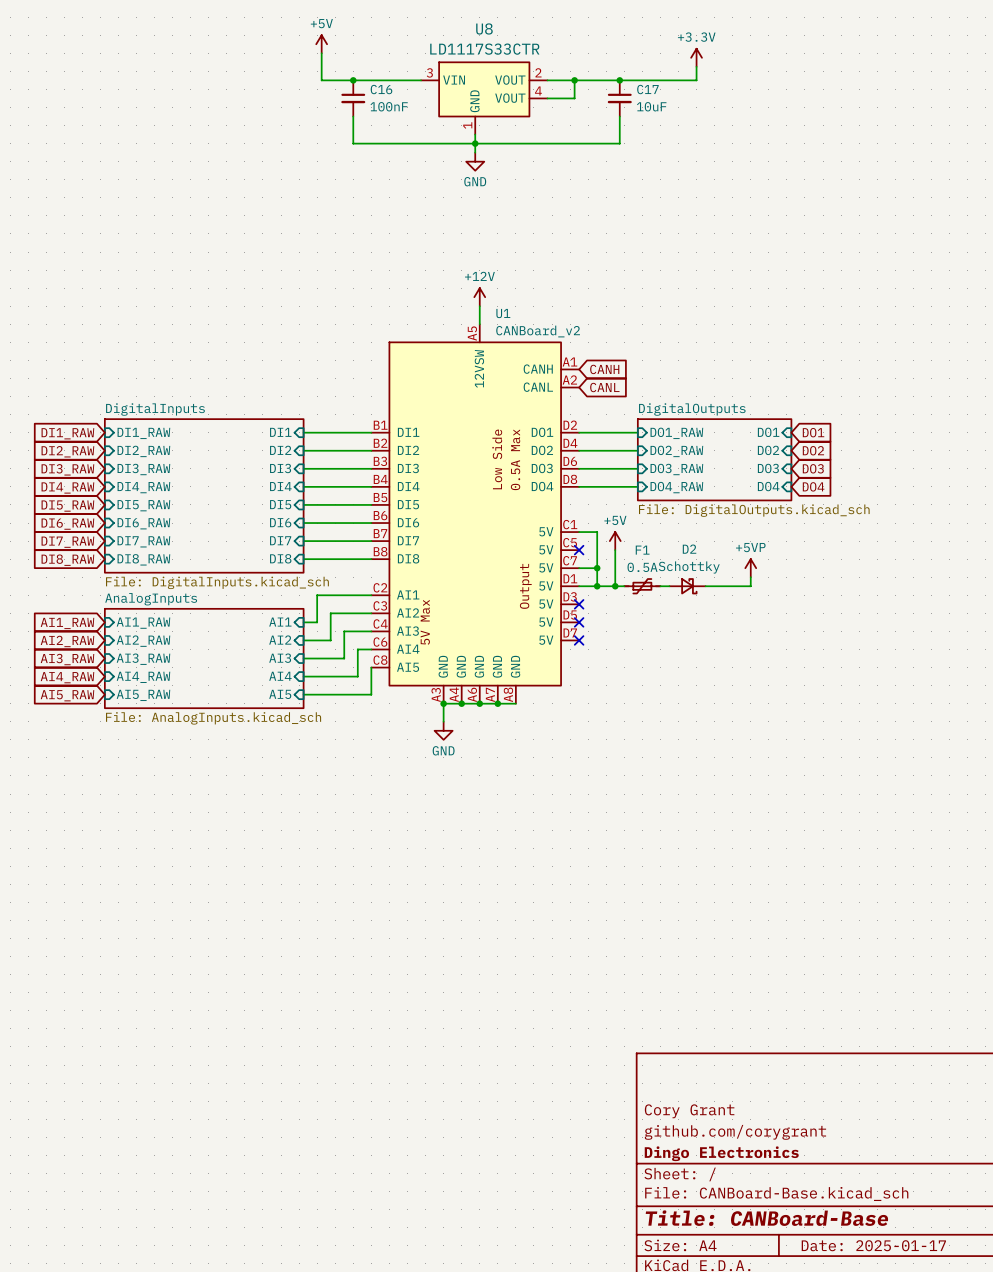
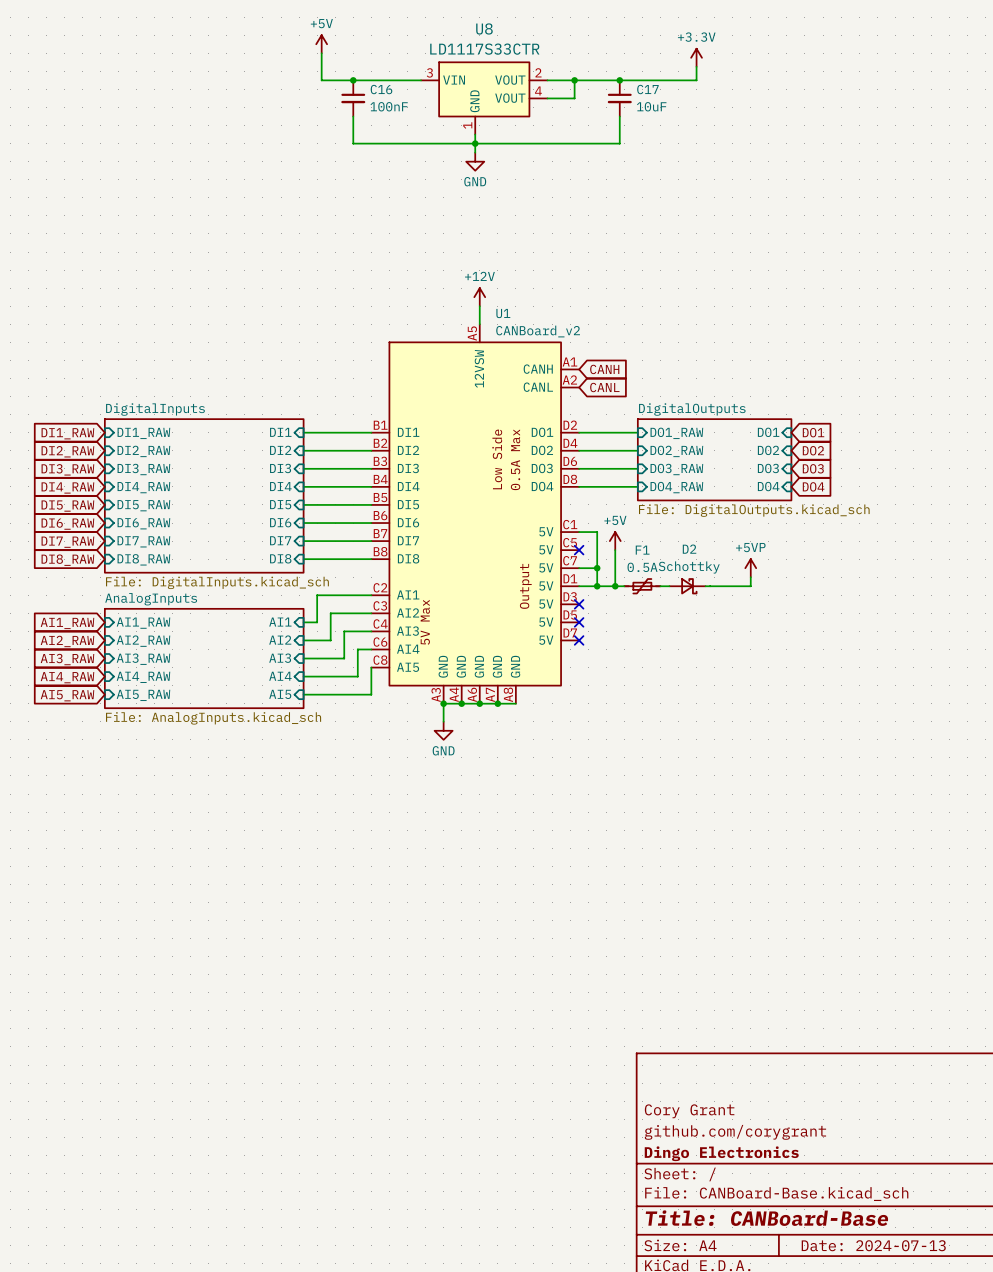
title block: Date: 2025-01-17 (873, 1245) -> Date: 2024-07-13 (873, 1245)

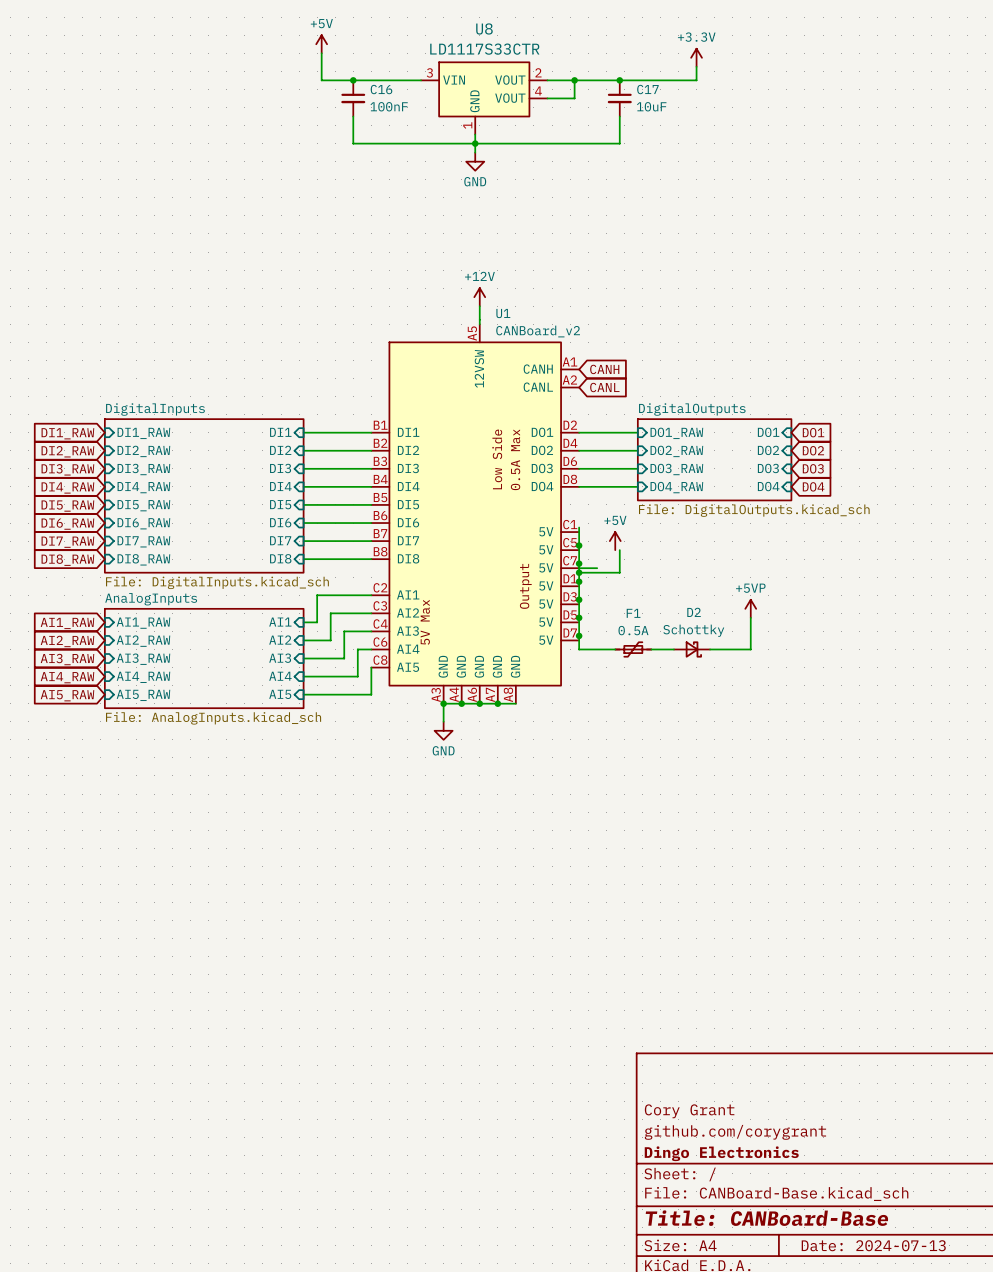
wire: none -> (579, 527) (579, 649) (615, 649)
wire: (579, 532) (597, 532) (597, 586) -> none
junction: none -> (579, 545)
no-connect mark: (579, 550) -> none
wire: (615, 550) (615, 586) -> none
wire: none -> (619, 550) (619, 572) (579, 572)
junction: none -> (579, 563)
junction: (597, 568) -> none
power symbol position: +5VP (750, 568) -> +5VP (750, 608)
junction: none -> (579, 572)
wire: (750, 577) (750, 586) (705, 586) -> none
junction: none -> (579, 581)
wire: (579, 586) (624, 586) -> none
junction: (597, 586) -> none
junction: (615, 586) -> none
F1 position: (642, 586) -> (633, 649)
wire: (660, 586) (669, 586) -> none
D2 position: (687, 586) -> (692, 649)
junction: none -> (579, 599)
no-connect mark: (579, 604) -> none
junction: none -> (579, 617)
wire: none -> (750, 617) (750, 649) (710, 649)
no-connect mark: (579, 622) -> none
junction: none -> (579, 635)
no-connect mark: (579, 640) -> none
wire: none -> (651, 649) (673, 649)

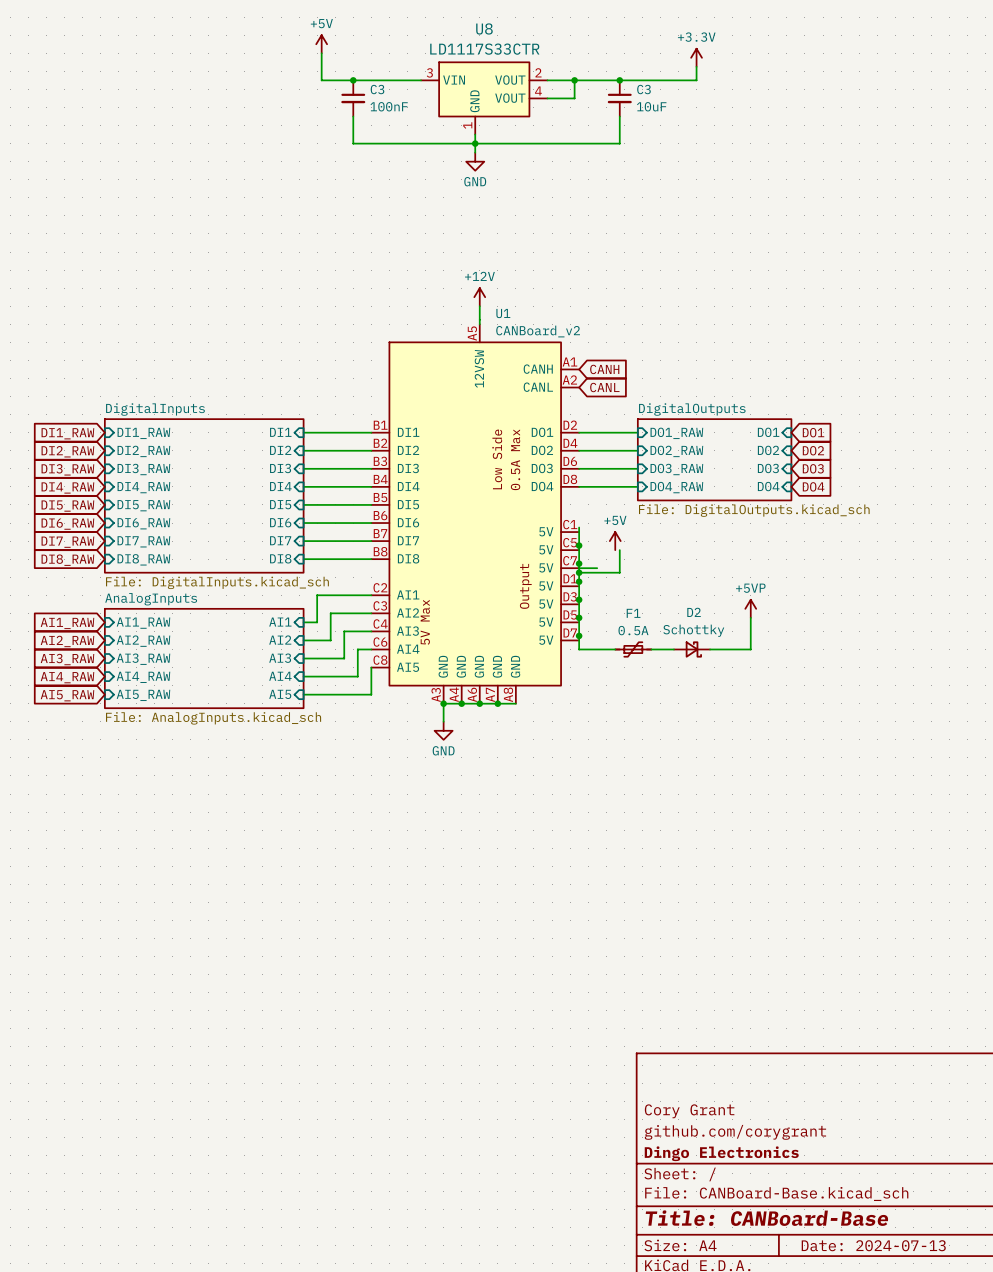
C16 name: C16 (381, 89) -> C3 (377, 89)
C17 name: C17 (647, 89) -> C3 (643, 89)

